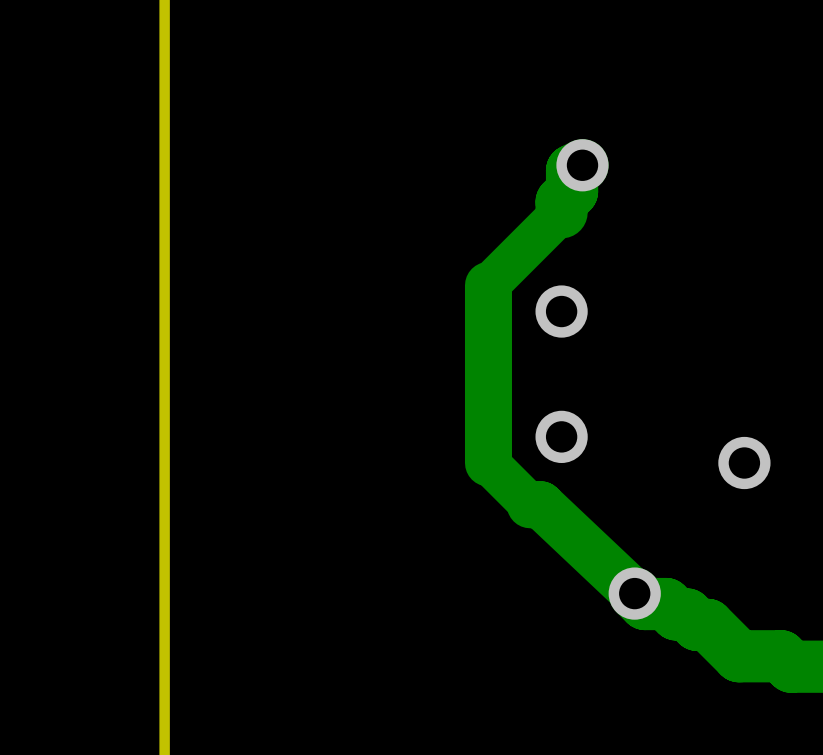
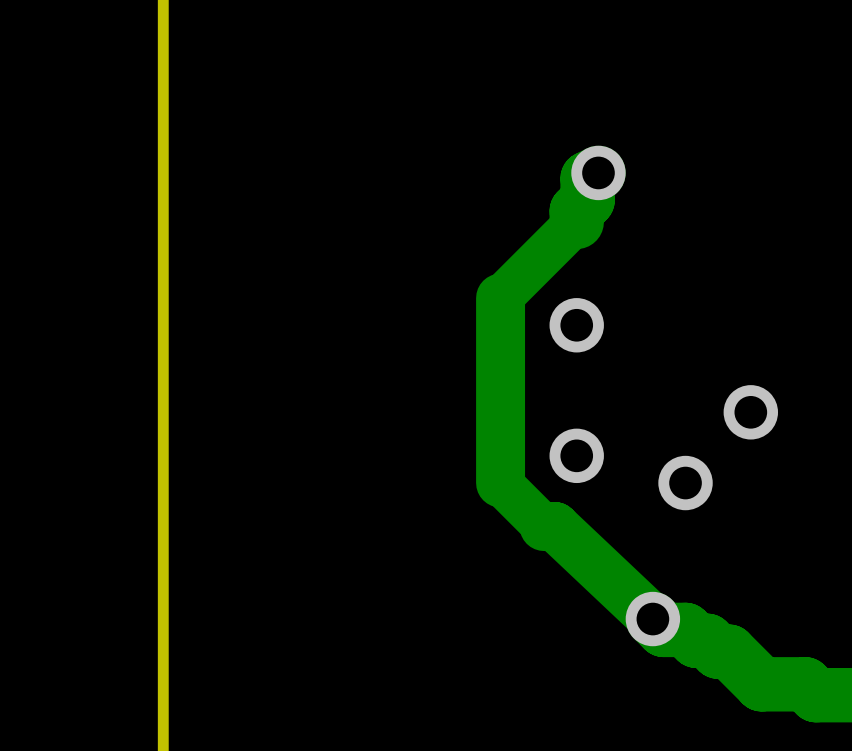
via: none -> (750, 412)
via: none -> (685, 483)
via: (744, 463) -> none

